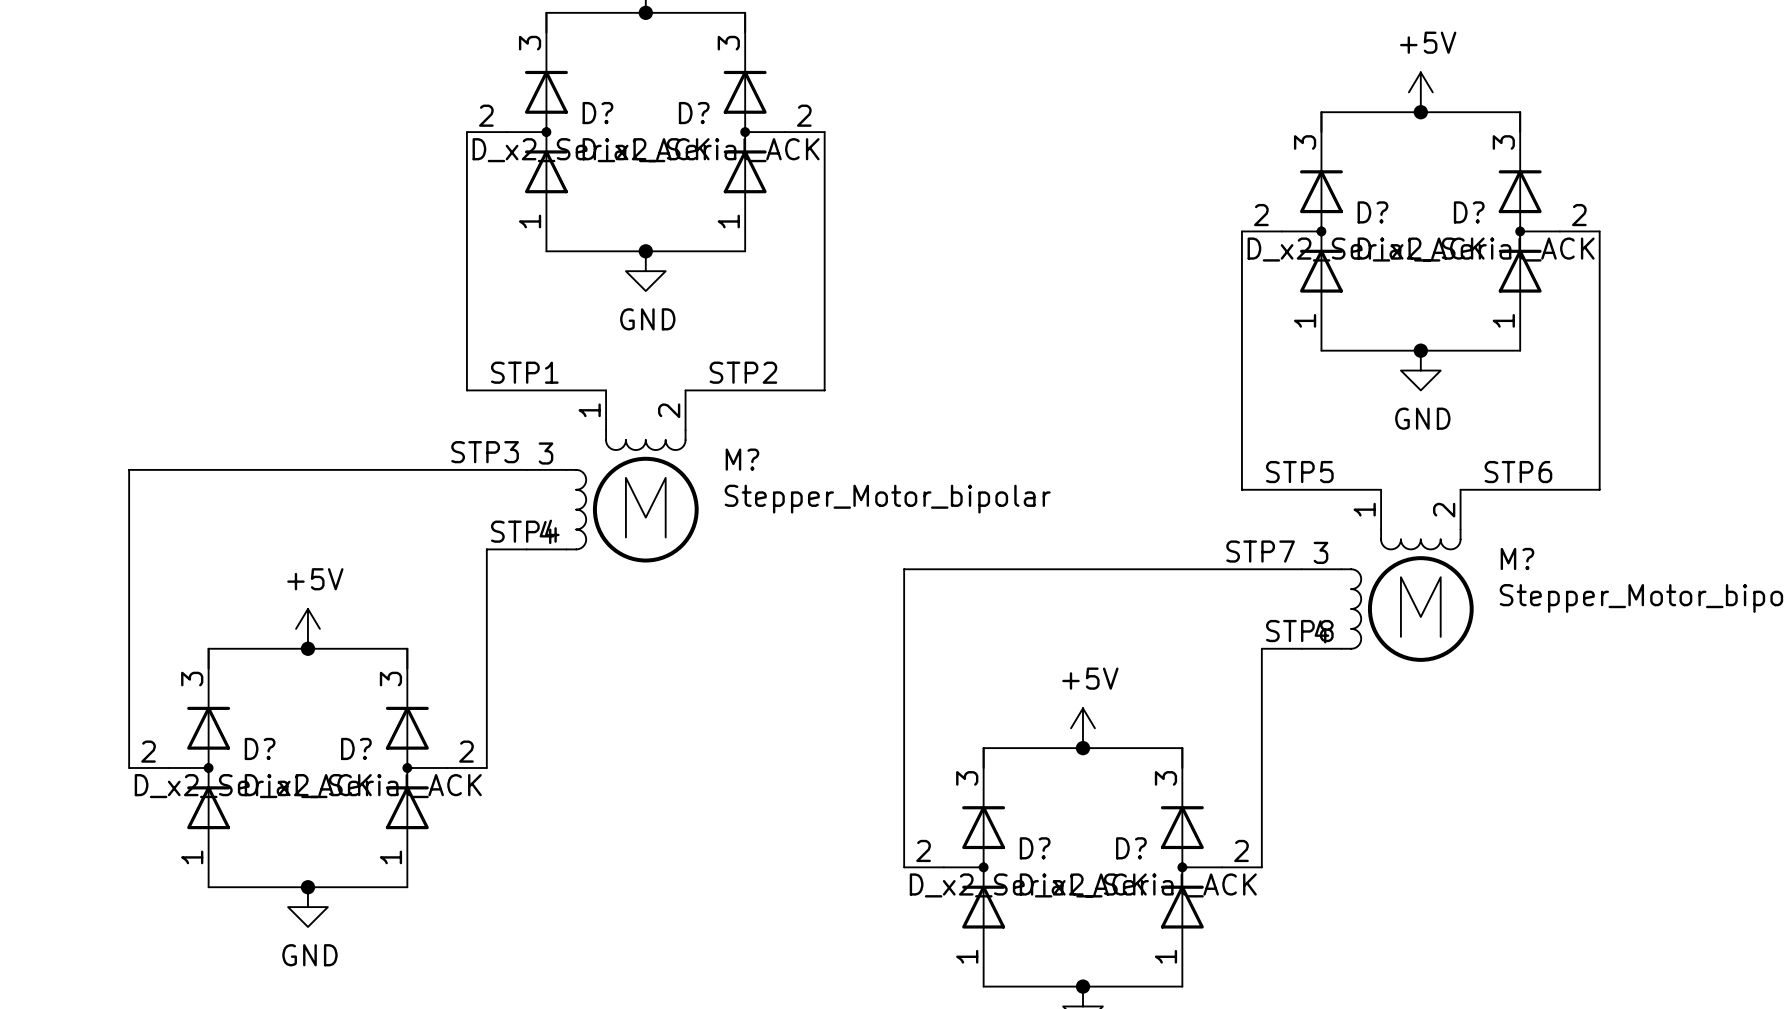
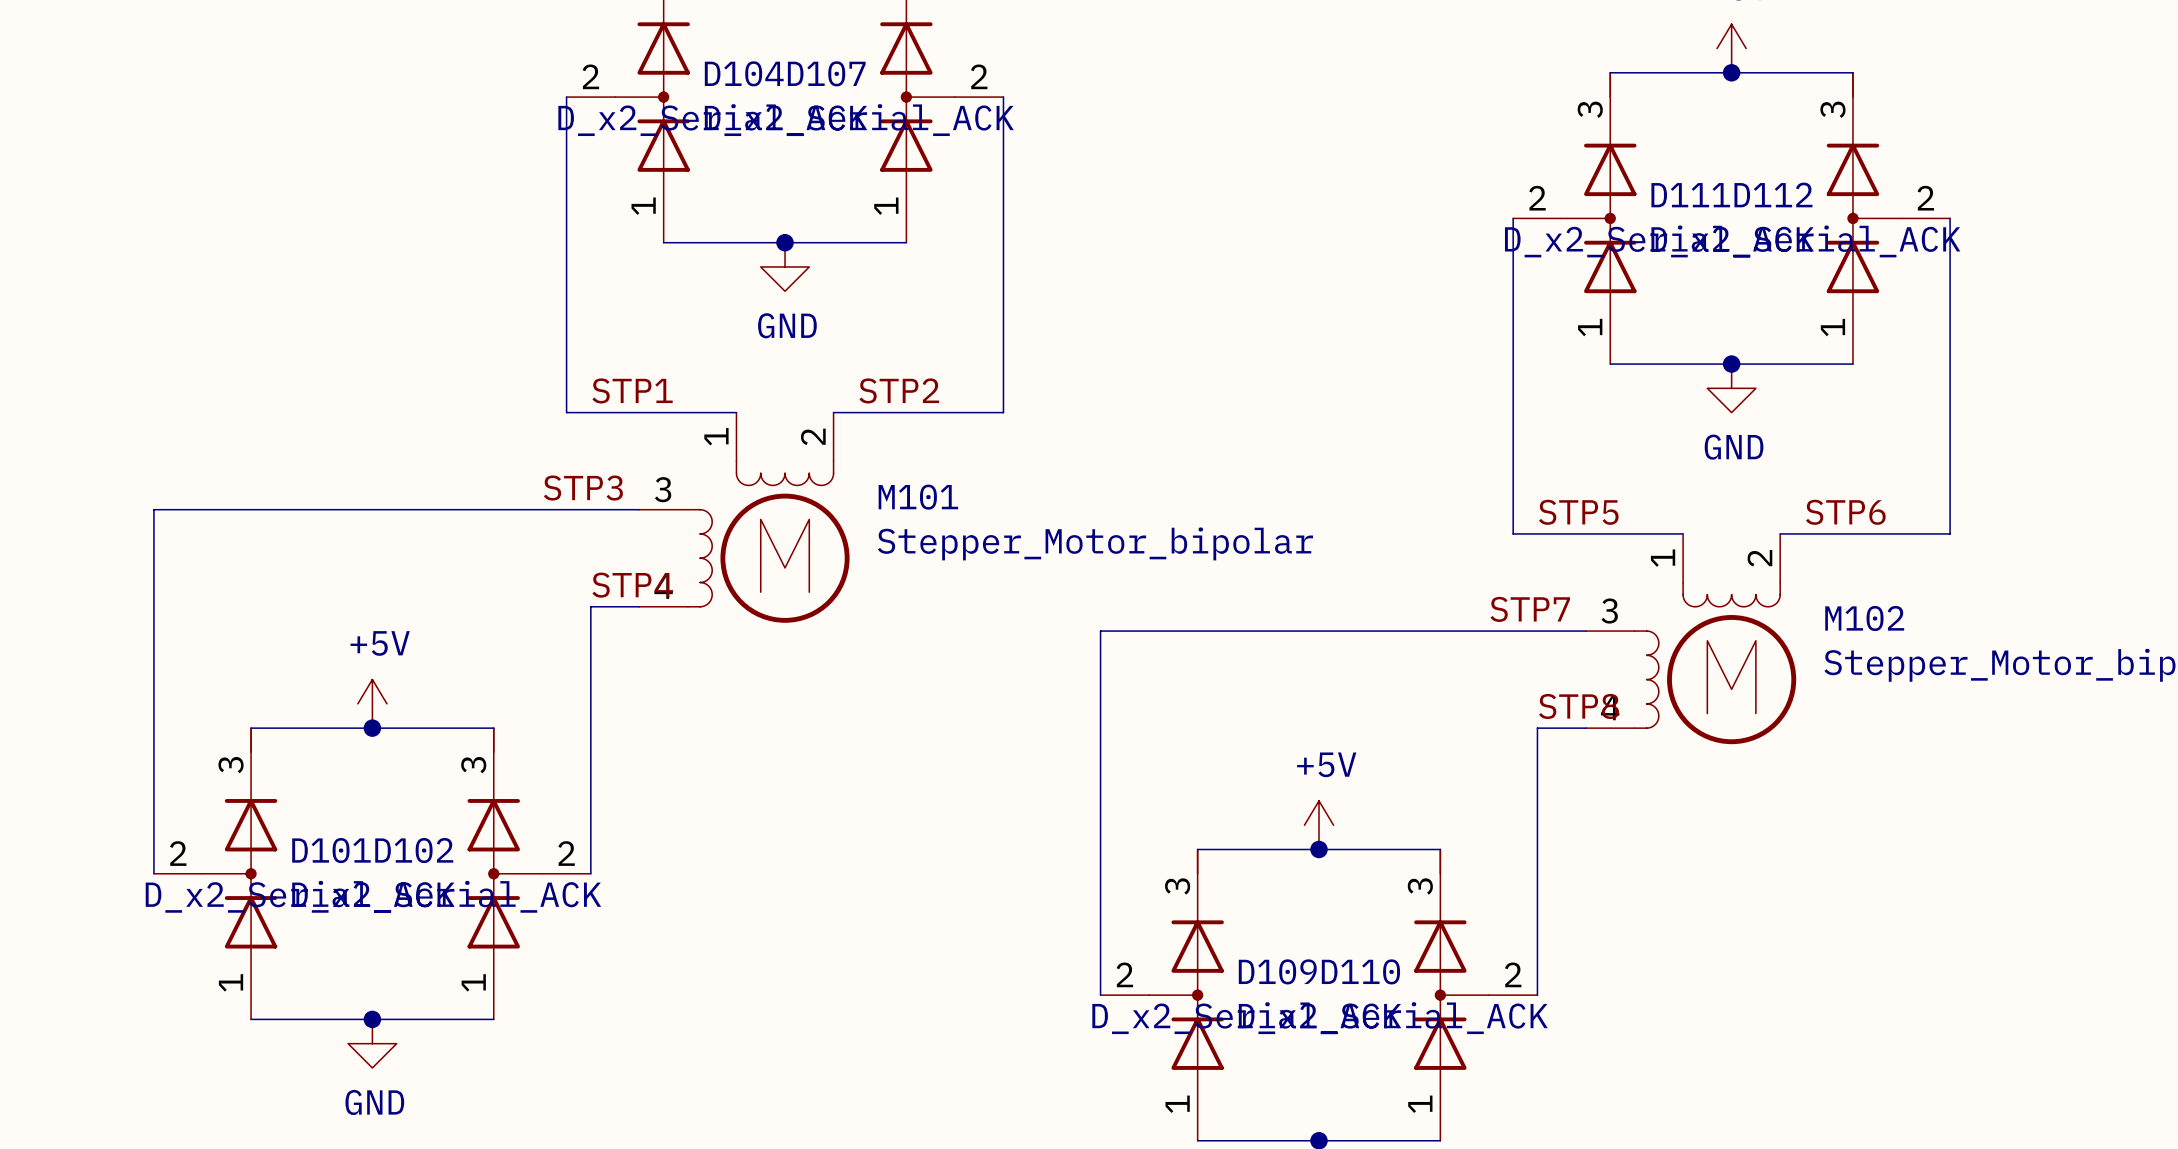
D? name: D? (597, 113) -> D104 (744, 73)
D? name: D? (694, 113) -> D107 (826, 73)
D? name: D? (1372, 212) -> D111 (1690, 195)
D? name: D? (1469, 212) -> D112 (1773, 194)
M? name: M? (742, 459) -> M101 (918, 497)
M? name: M? (1517, 558) -> M102 (1864, 618)
D? name: D? (260, 748) -> D101 (331, 850)
D? name: D? (356, 748) -> D102 (414, 850)
D? name: D? (1035, 848) -> D109 (1277, 971)
D? name: D? (1131, 848) -> D110 (1360, 971)

